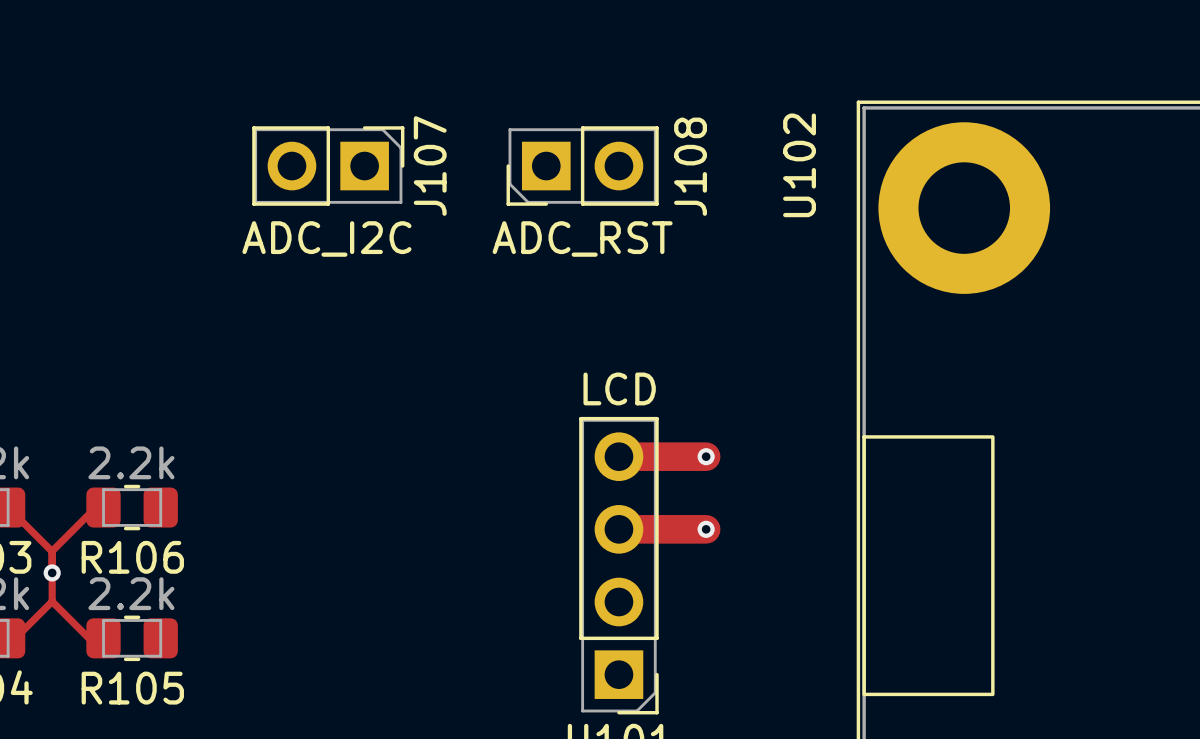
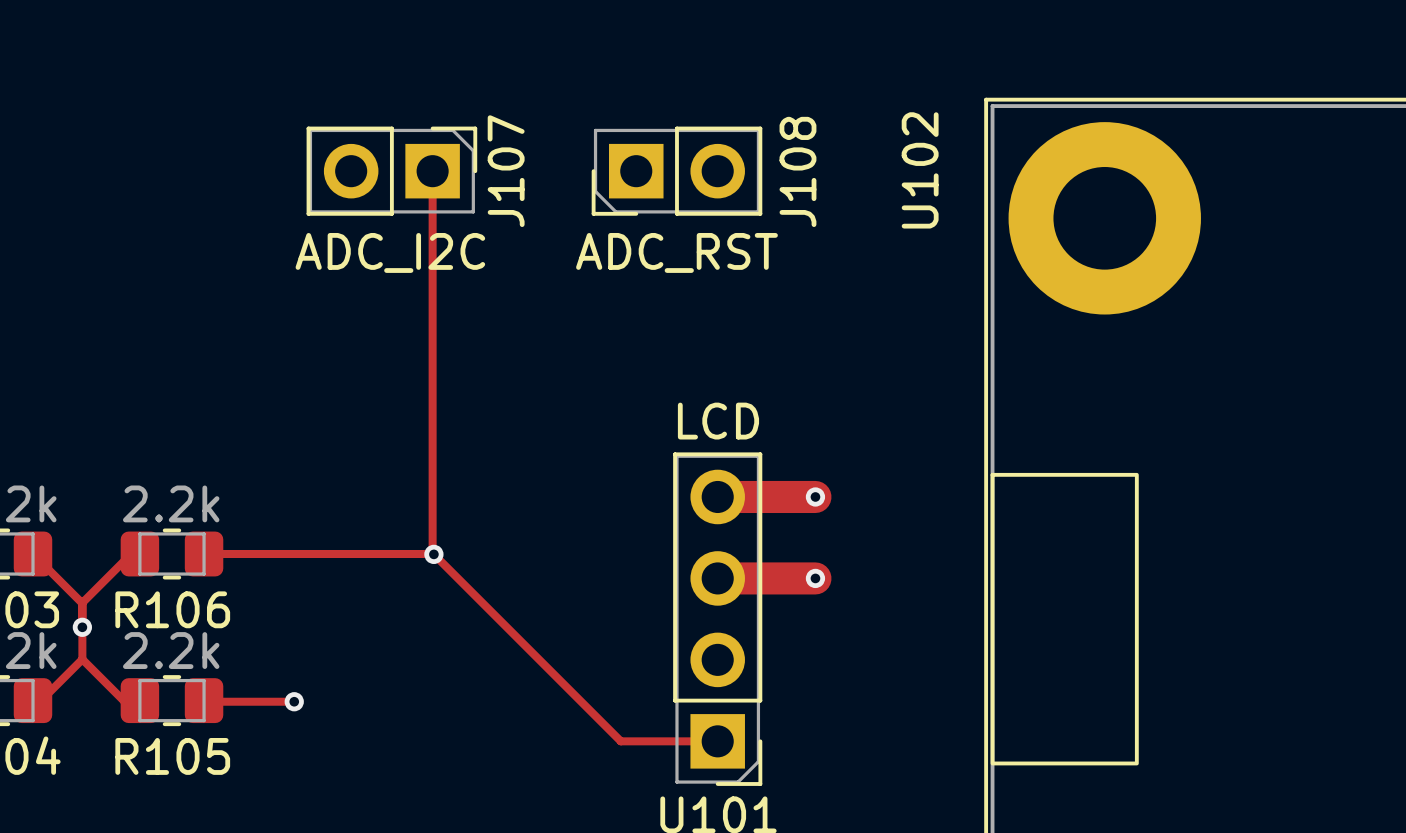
top track: none -> (432, 171) (432, 553) (620, 741) (717, 741)
top track: none -> (204, 554) (433, 554)
via: none -> (433, 554)
top track: none -> (204, 700) (294, 701)
via: none -> (294, 701)

